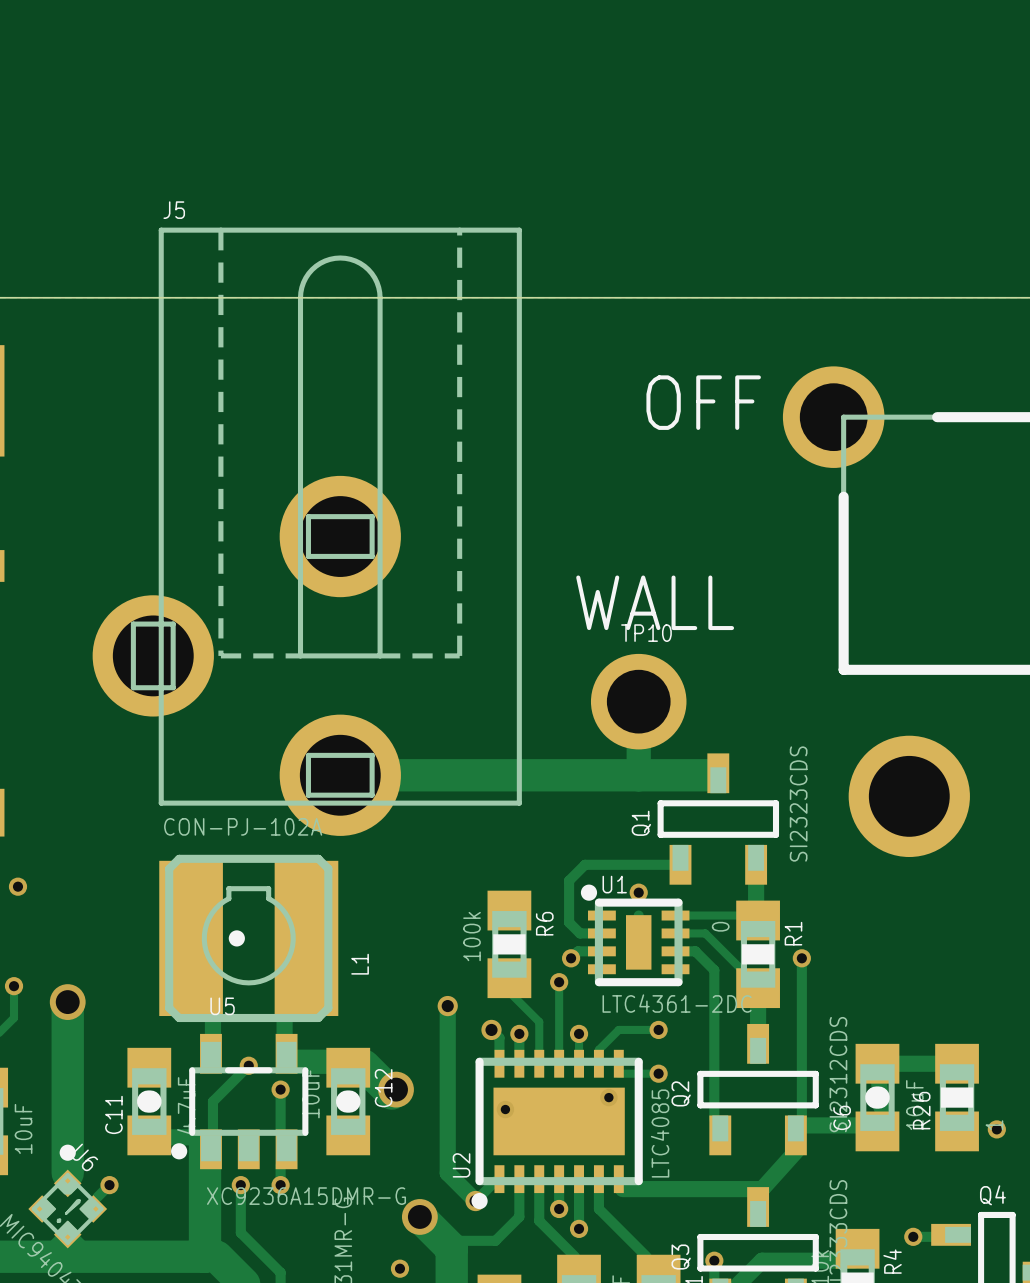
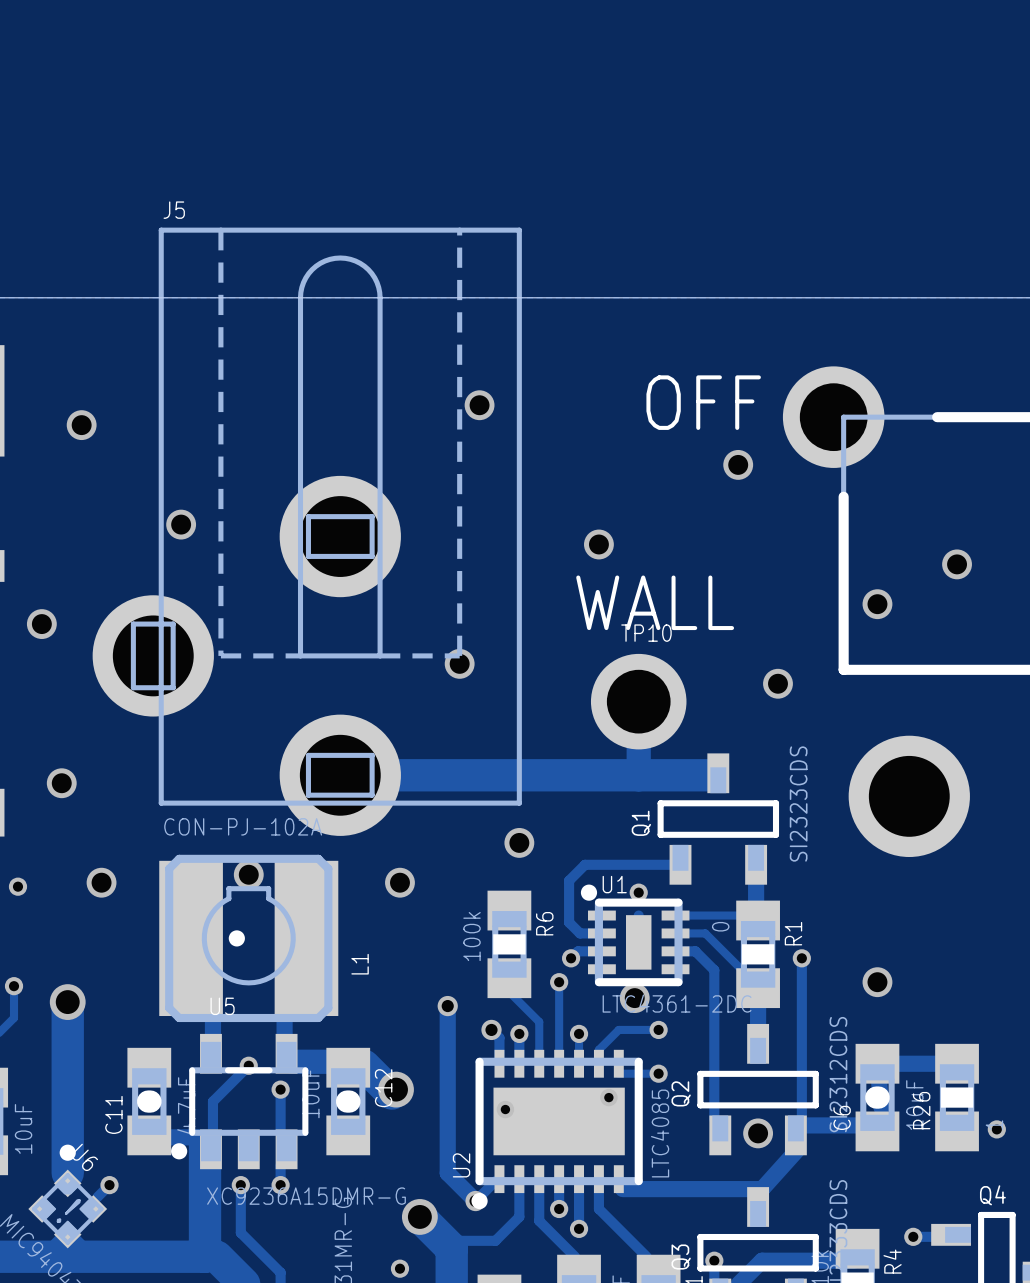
via: none -> (479, 405)
via: none -> (81, 425)
via: none -> (738, 464)
via: none -> (181, 524)
via: none -> (598, 544)
via: none -> (957, 564)
via: none -> (877, 604)
via: none -> (41, 624)
via: none -> (459, 663)
via: none -> (777, 683)
via: none -> (61, 783)
via: none -> (519, 842)
via: none -> (248, 874)
via: none -> (101, 882)
via: none -> (399, 882)
via: none -> (877, 982)
via: none -> (634, 998)
via: none -> (758, 1133)

